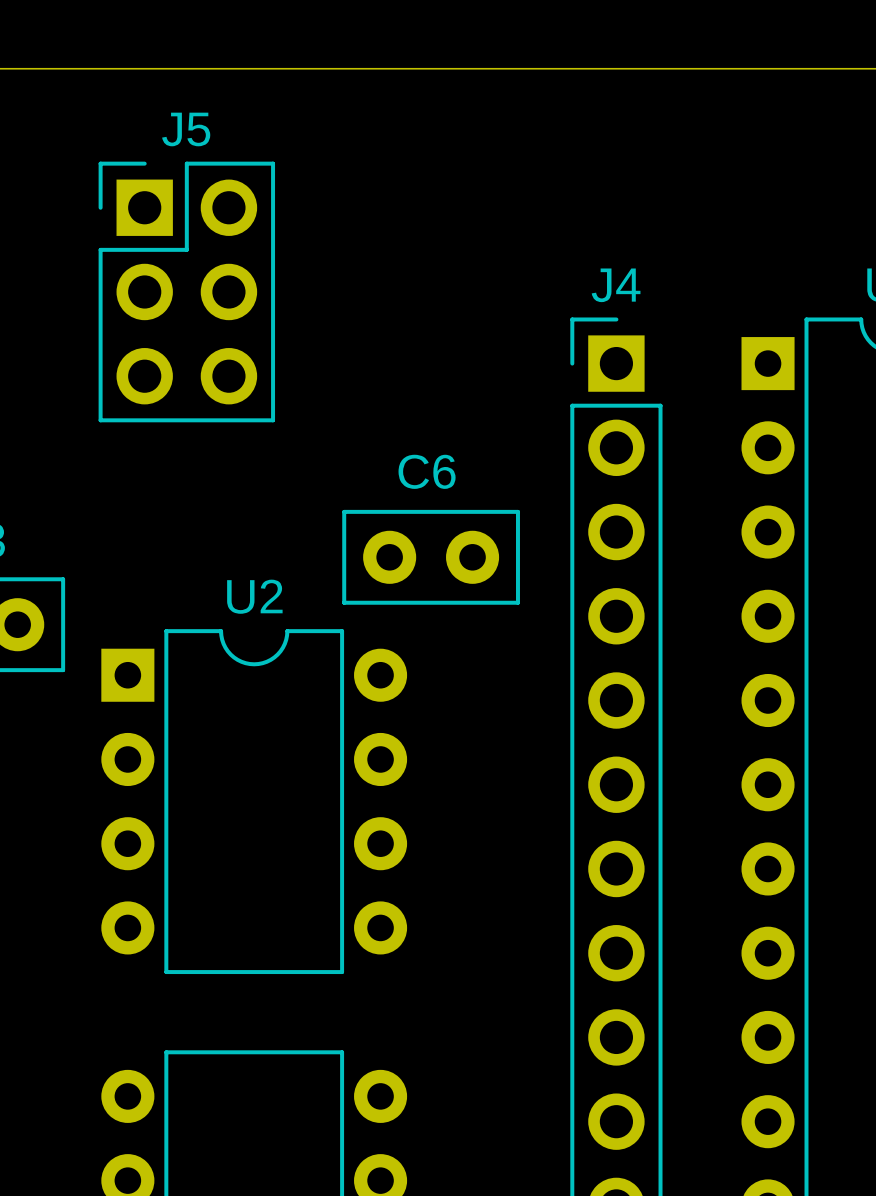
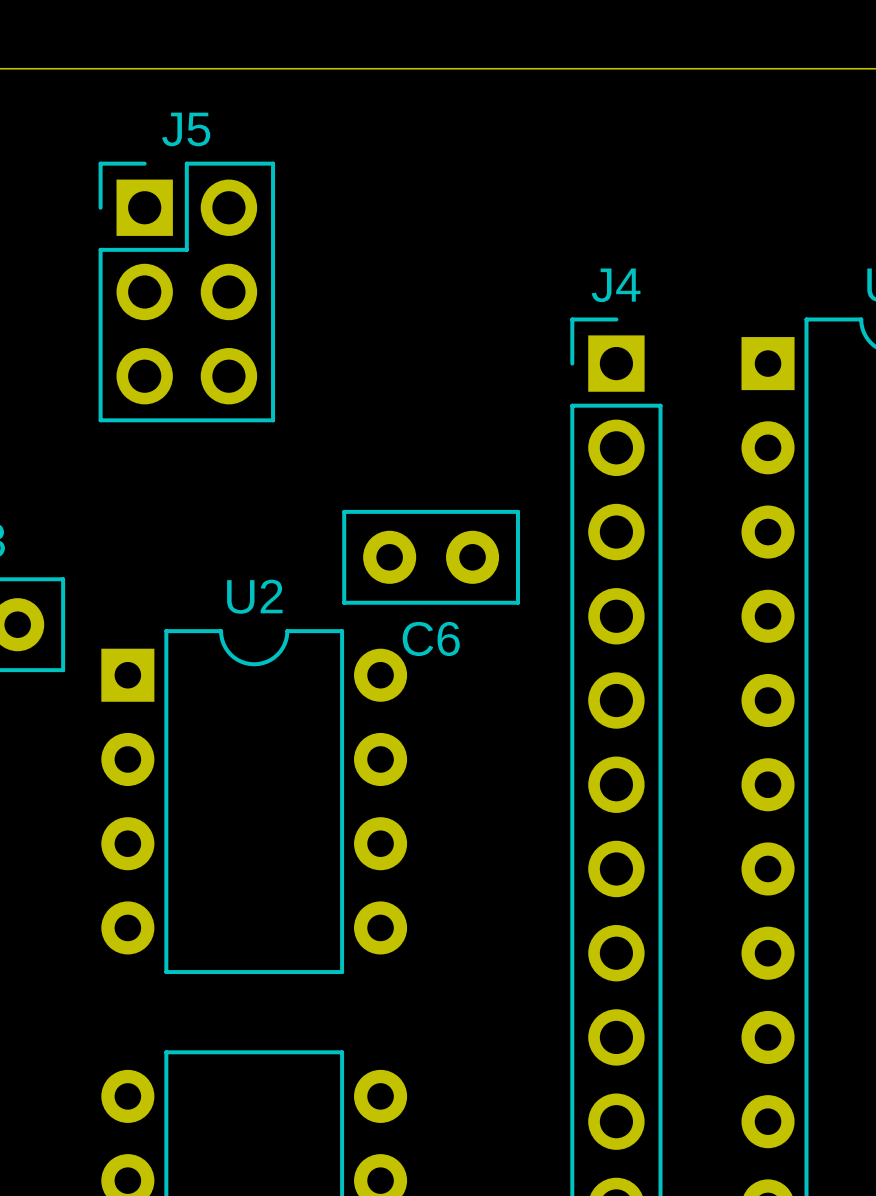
C6 name position: C6 (427, 471) -> C6 (431, 638)

